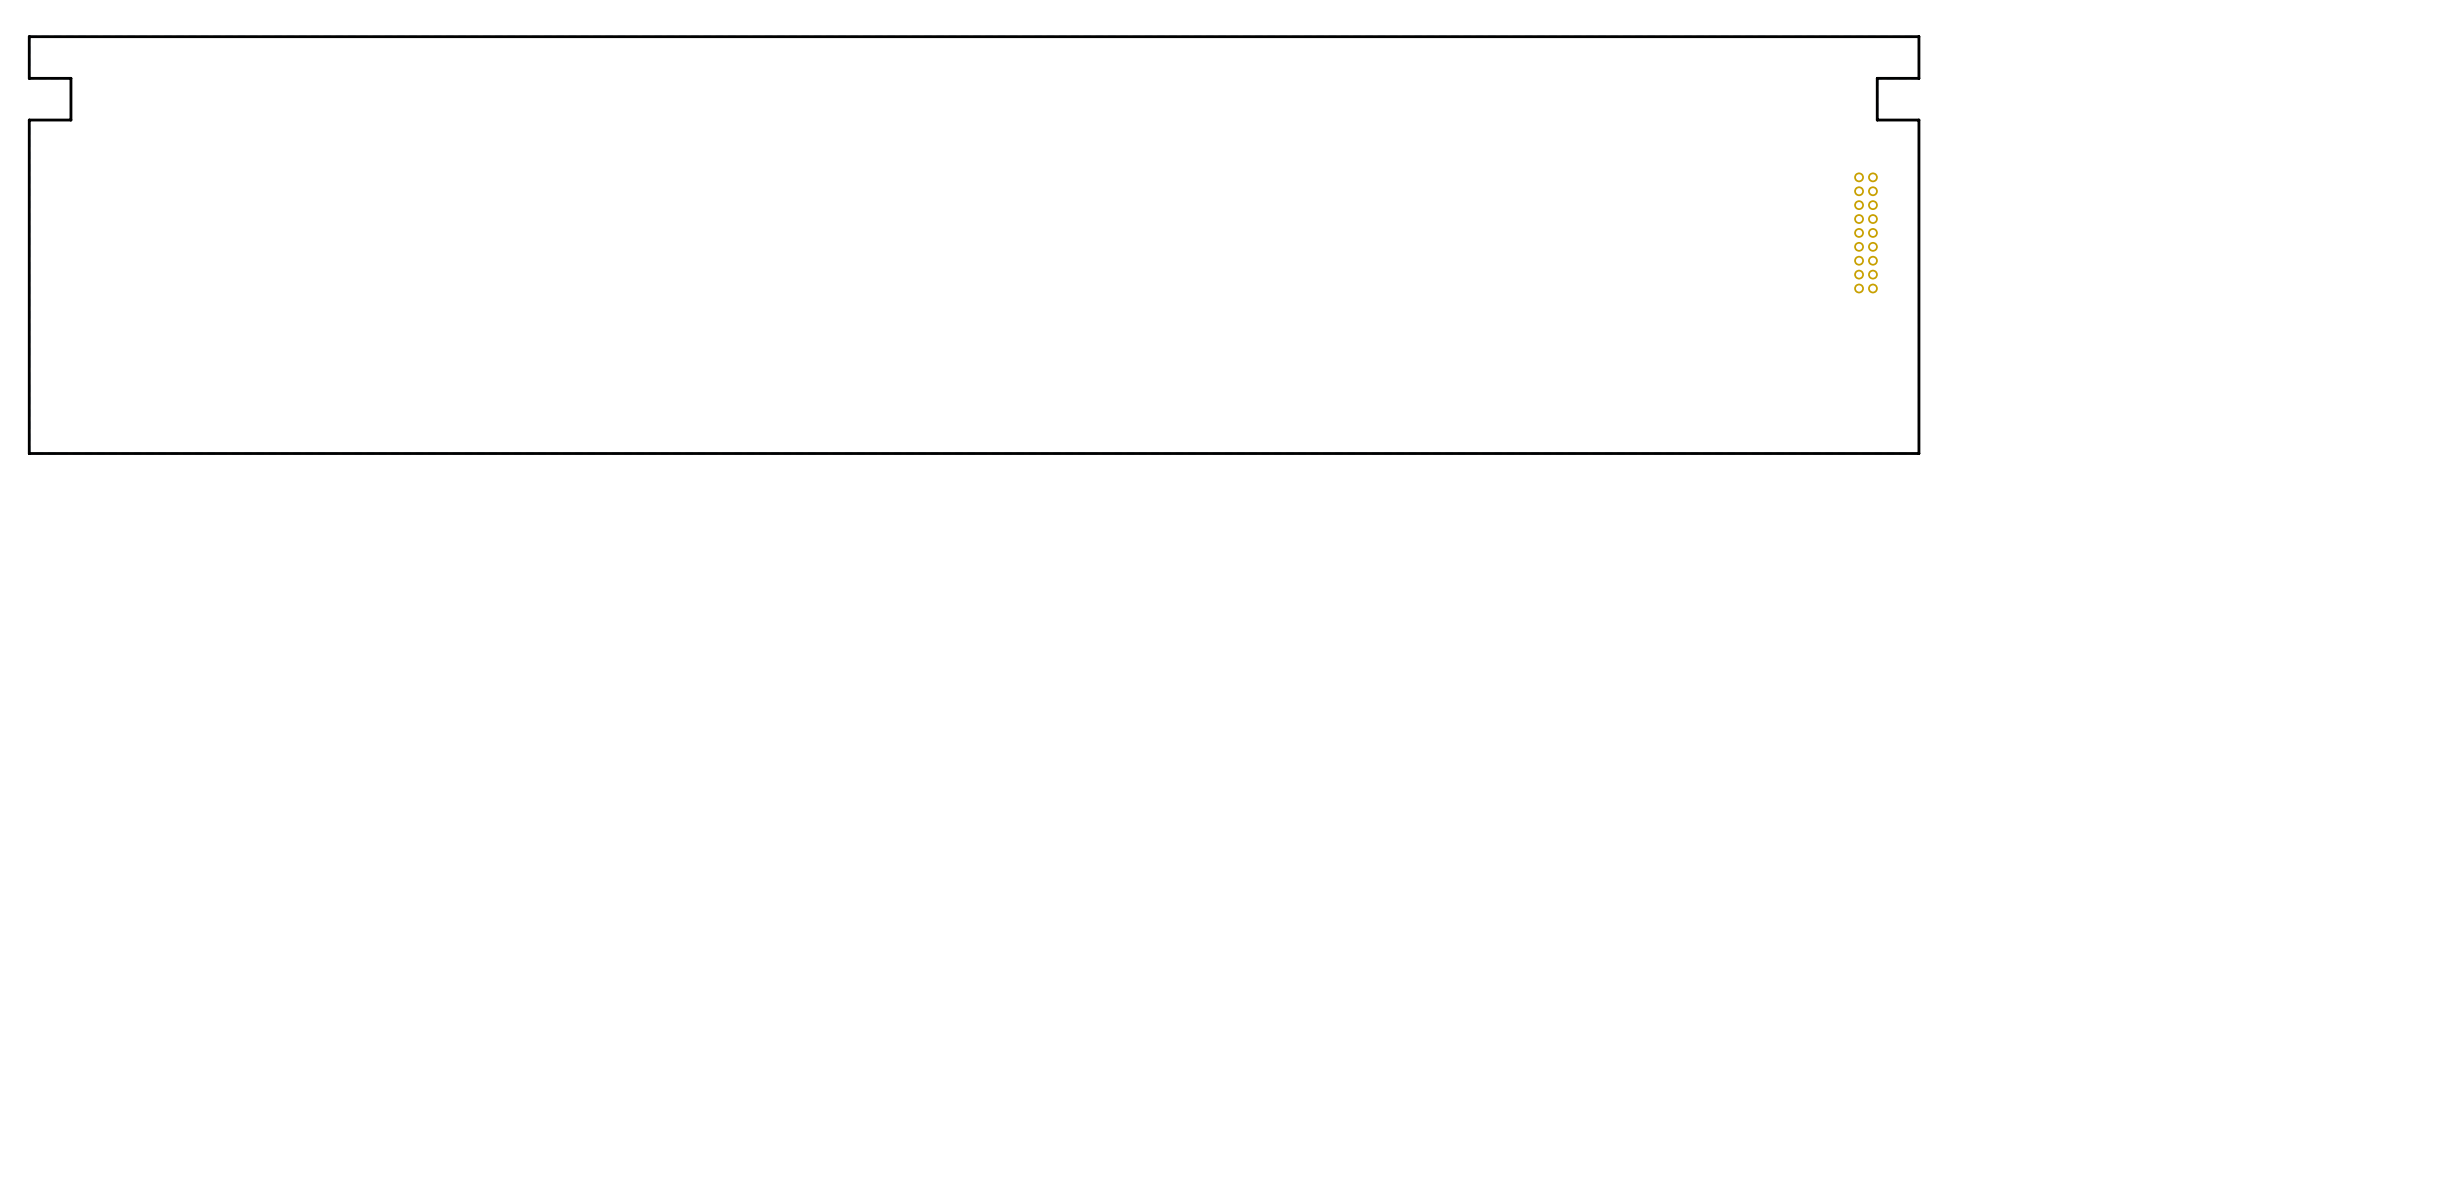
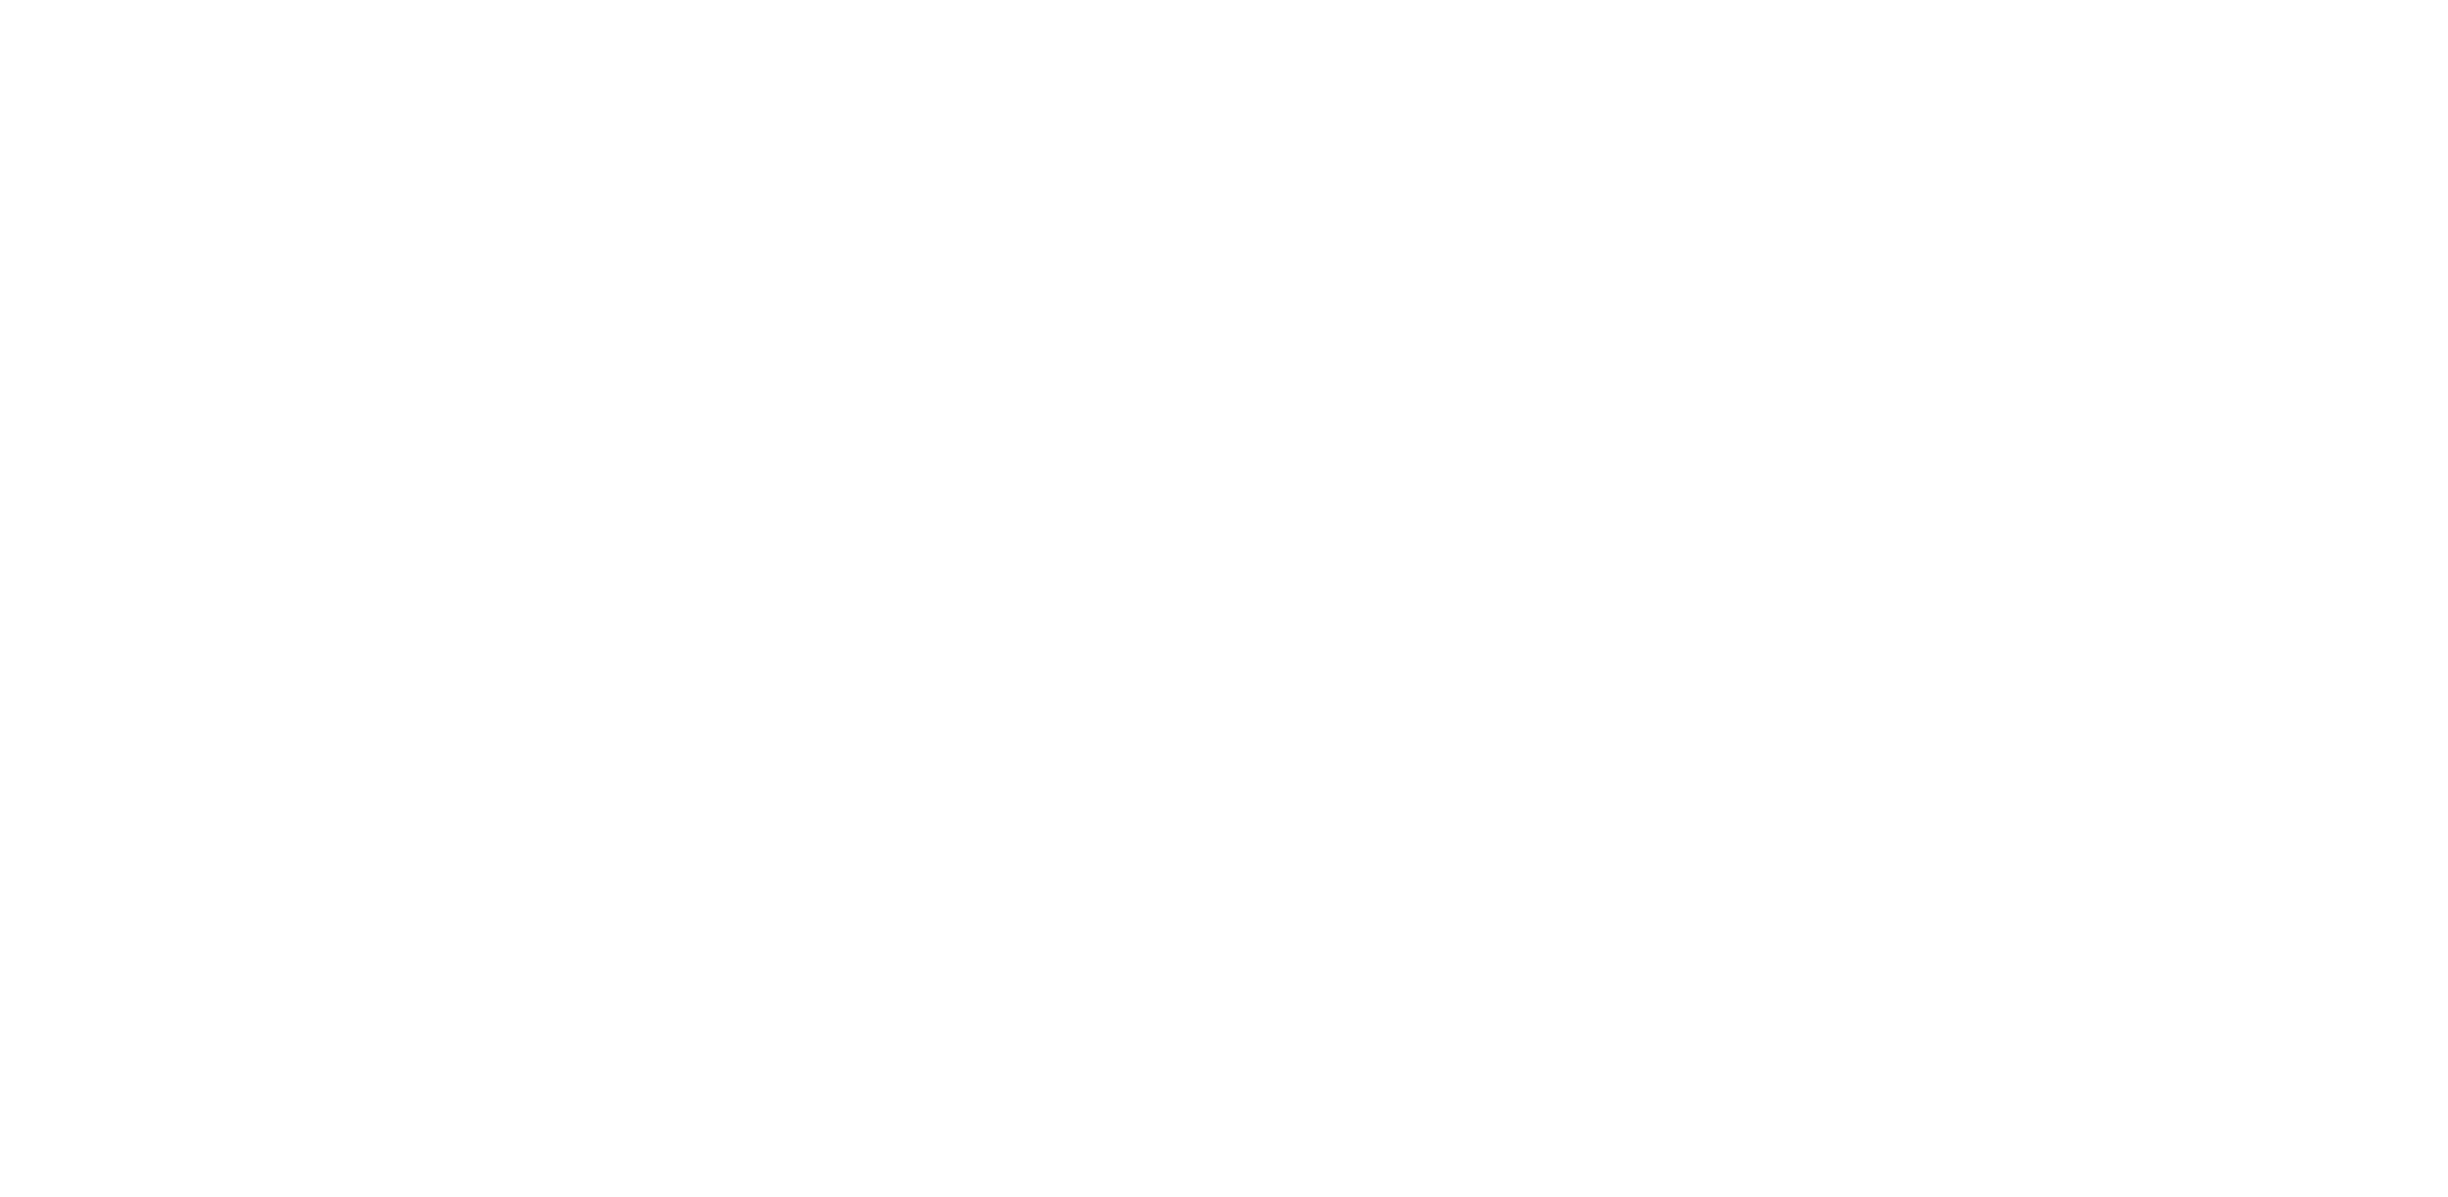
board edge: (1918, 36) (29, 36) (29, 78) (70, 78) (70, 120) (29, 120) (29, 453) (1918, 453) (1918, 120) (1877, 120) (1877, 78) (1918, 78) (1918, 36) -> none
part: (1866, 232) -> none

